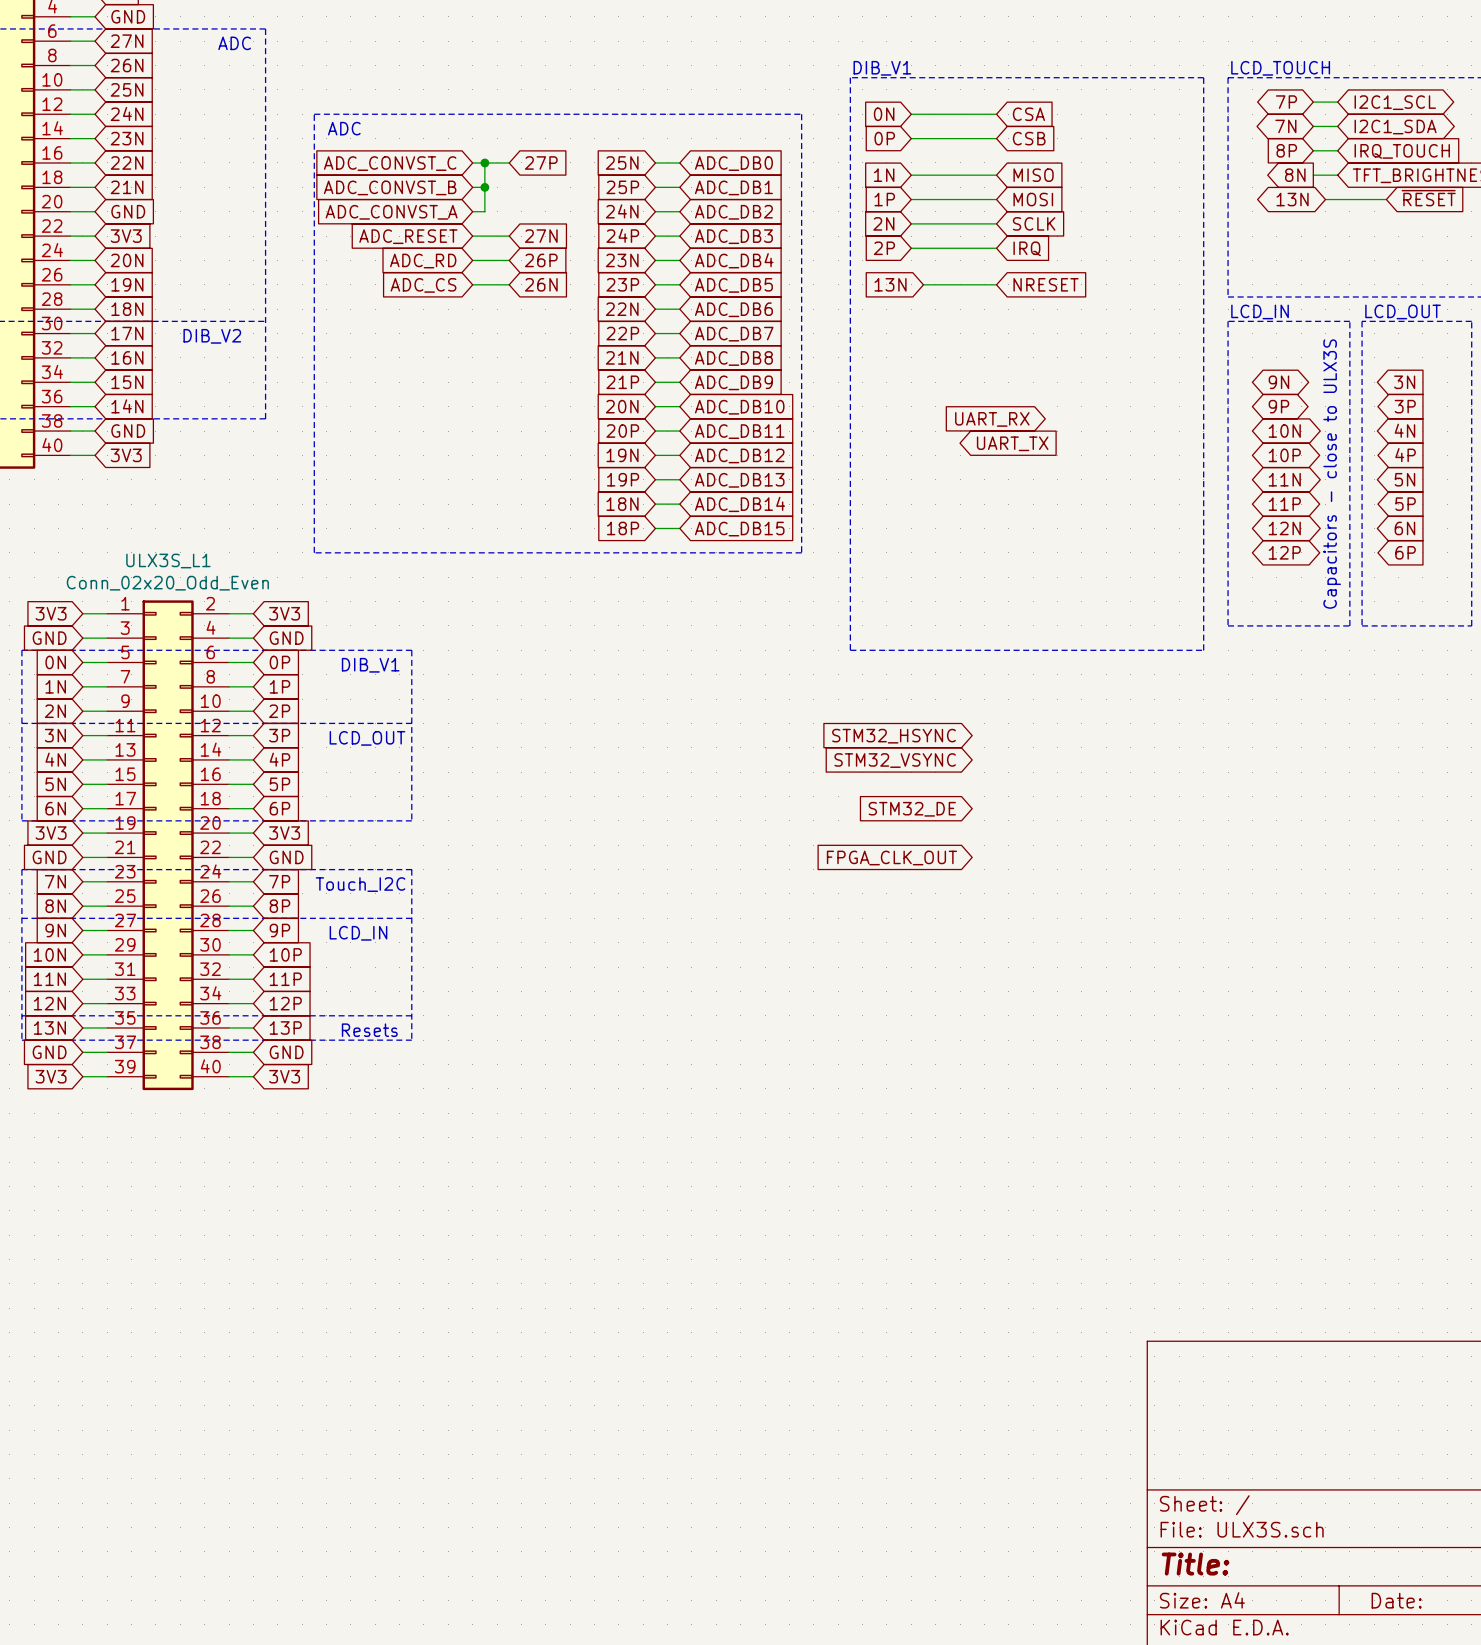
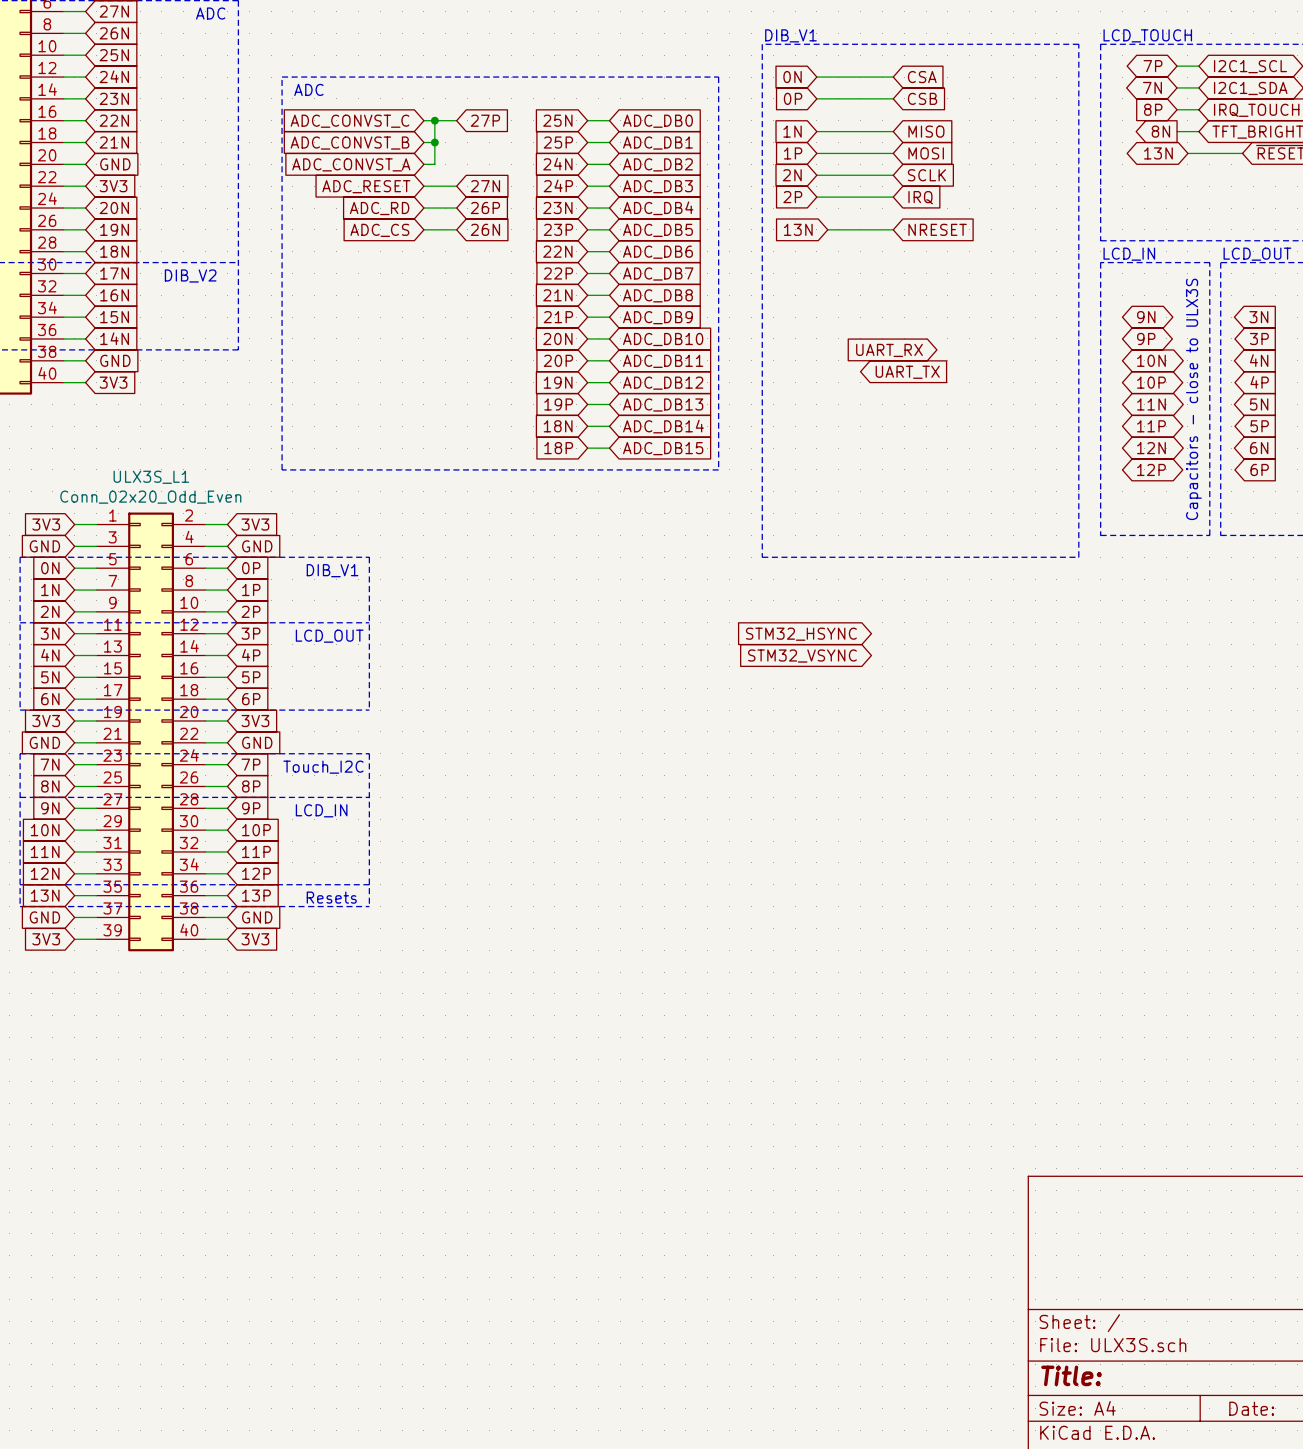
global label: STM32_DE (912, 809) -> none
global label: FPGA_CLK_OUT (891, 858) -> none

